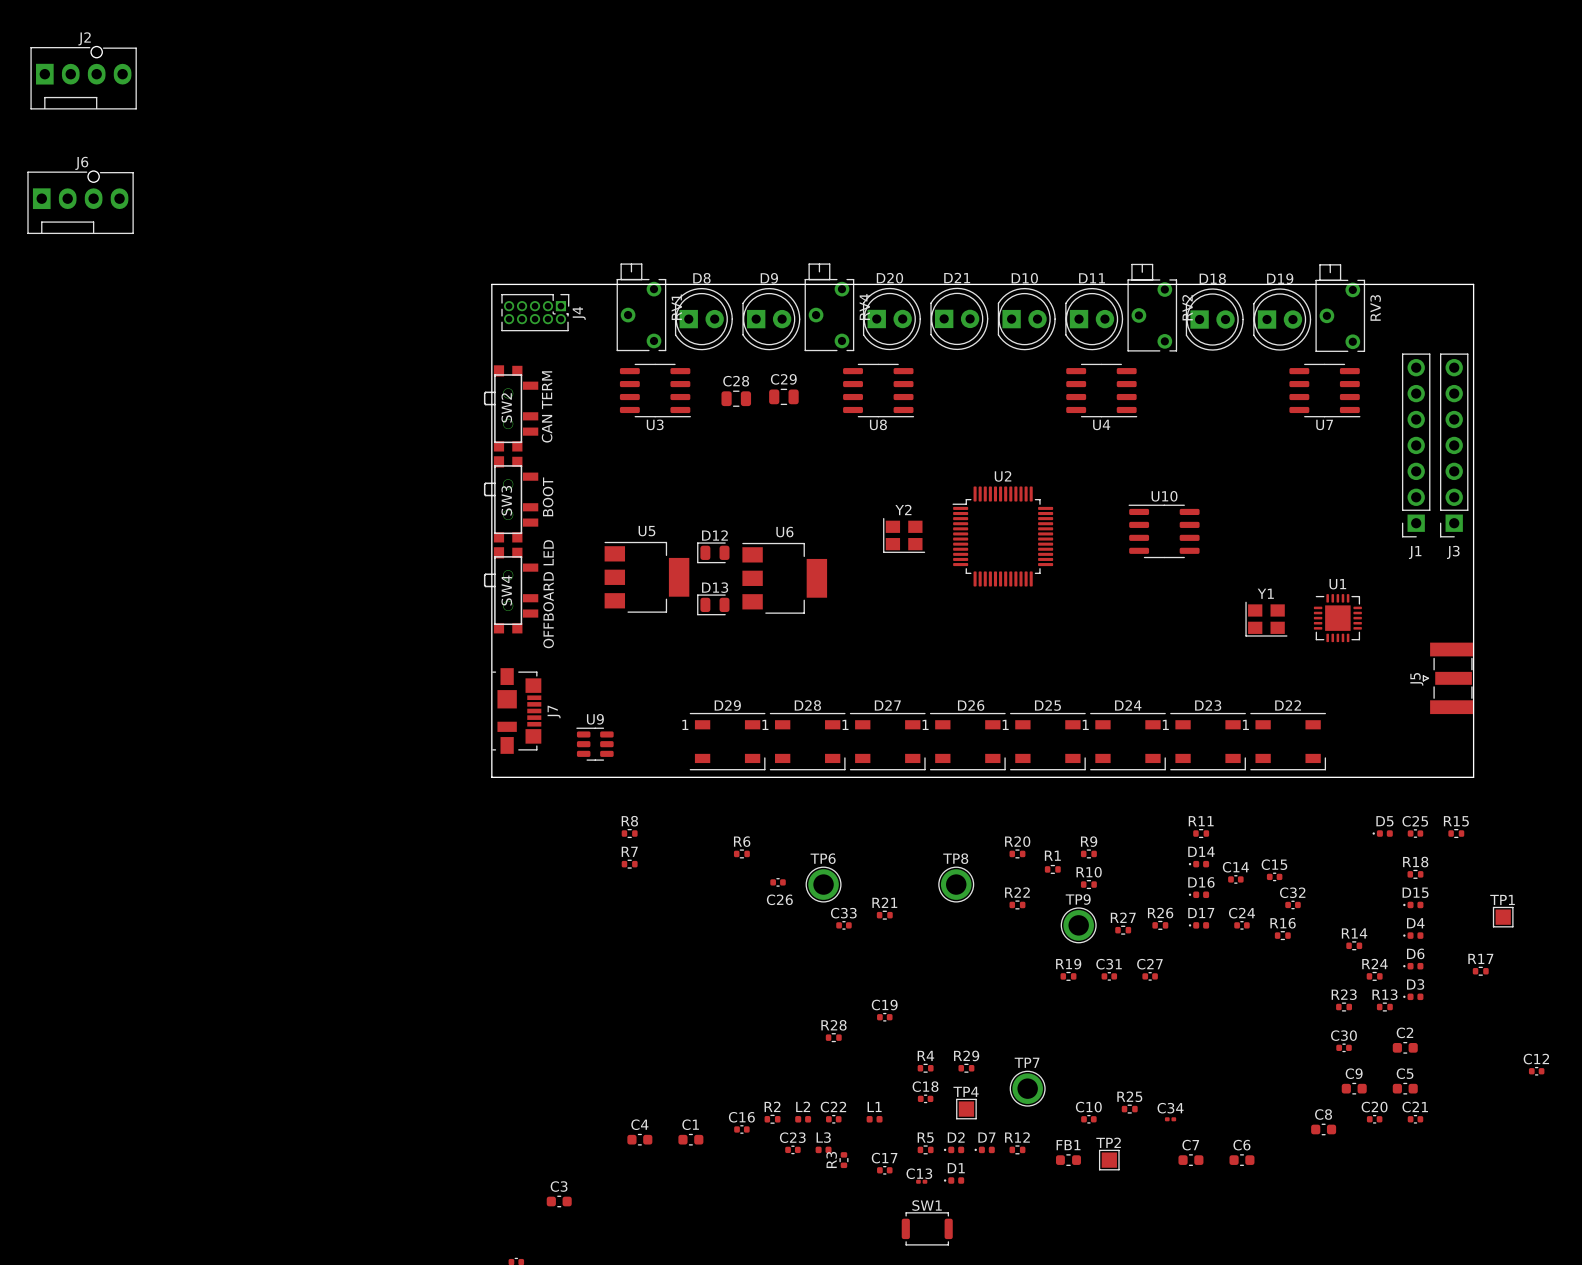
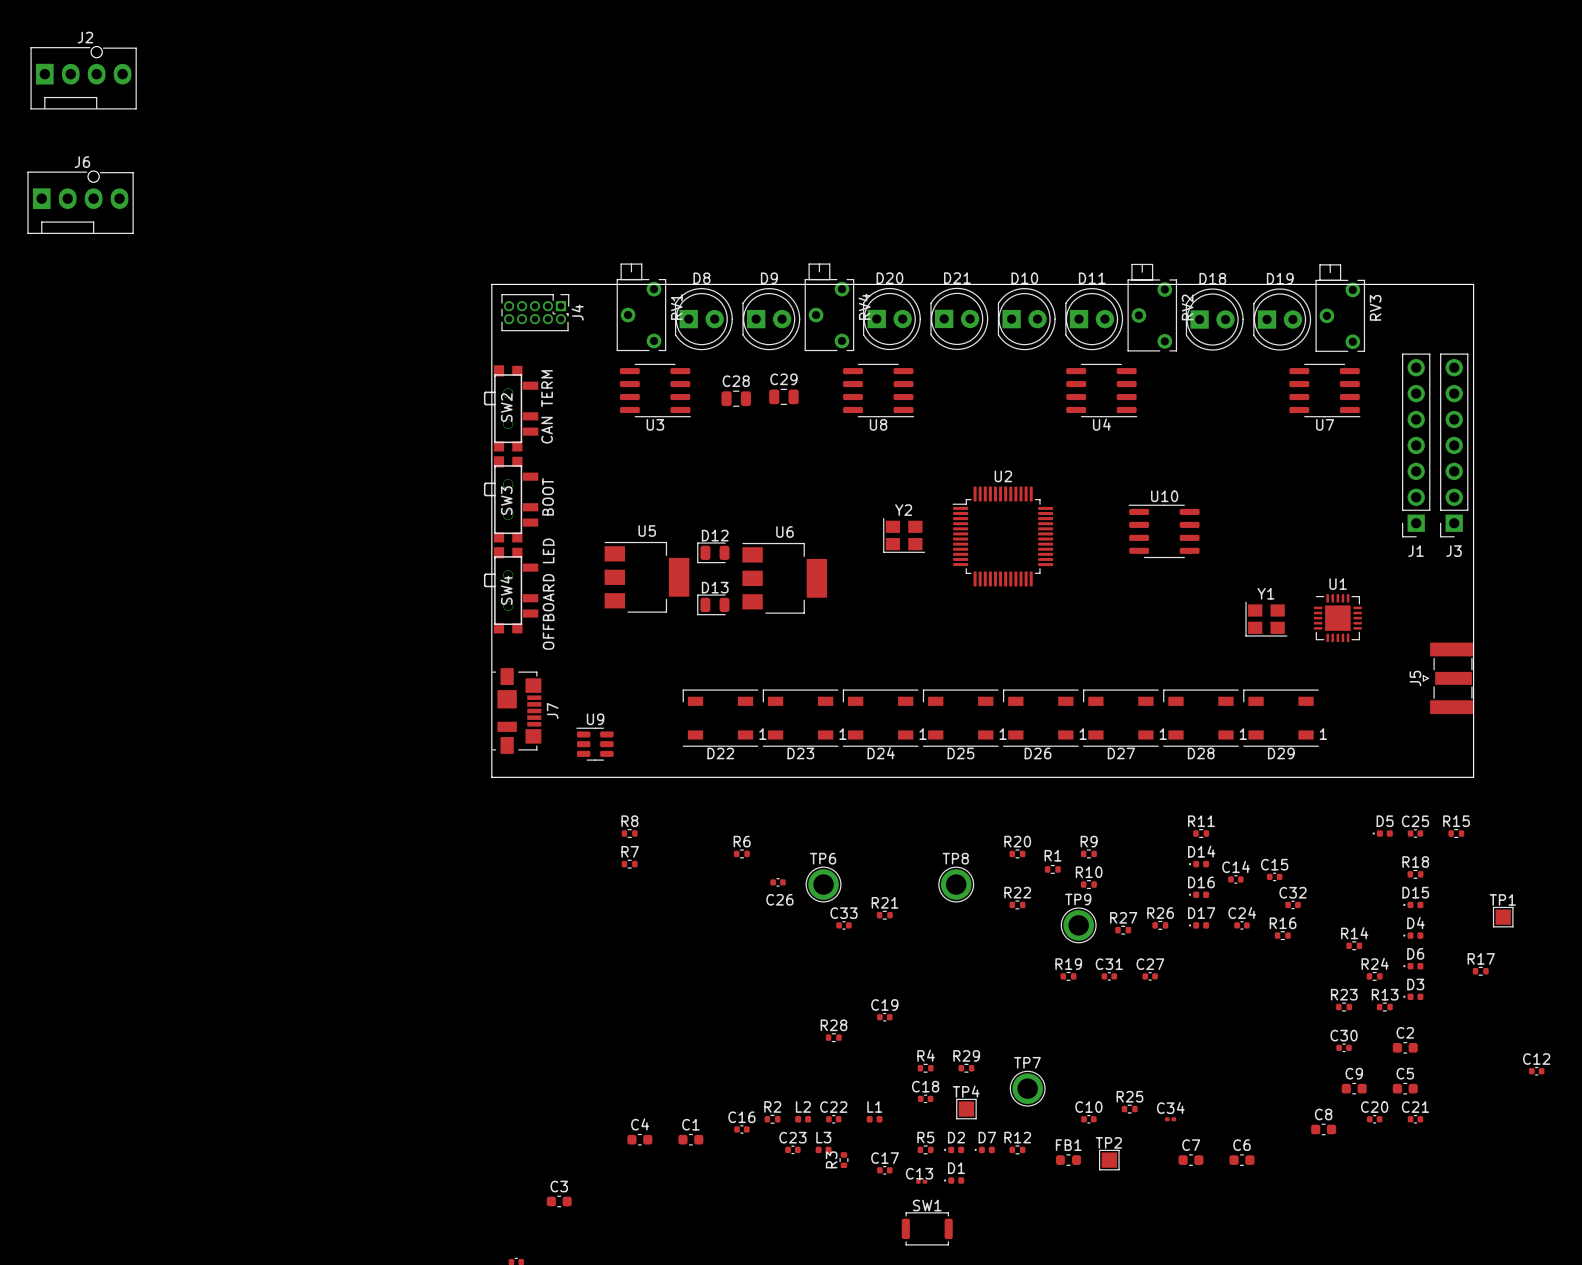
D29 rotation: 0° (727, 741) -> 180° (1281, 718)
D29 position: (727, 741) -> (1281, 718)
D28 rotation: 0° (807, 741) -> 180° (1200, 718)
D28 position: (807, 741) -> (1200, 718)
D27 rotation: 0° (887, 741) -> 180° (1120, 718)
D27 position: (887, 741) -> (1120, 718)
D26 rotation: 0° (967, 741) -> 180° (1040, 718)
D26 position: (967, 741) -> (1040, 718)
D25 rotation: 0° (1047, 741) -> 180° (960, 718)
D25 position: (1047, 741) -> (960, 718)
D24 rotation: 0° (1127, 741) -> 180° (880, 718)
D24 position: (1127, 741) -> (880, 718)
D23 rotation: 0° (1208, 741) -> 180° (800, 718)
D23 position: (1208, 741) -> (800, 718)
D22 rotation: 0° (1288, 741) -> 180° (720, 718)
D22 position: (1288, 741) -> (720, 718)

